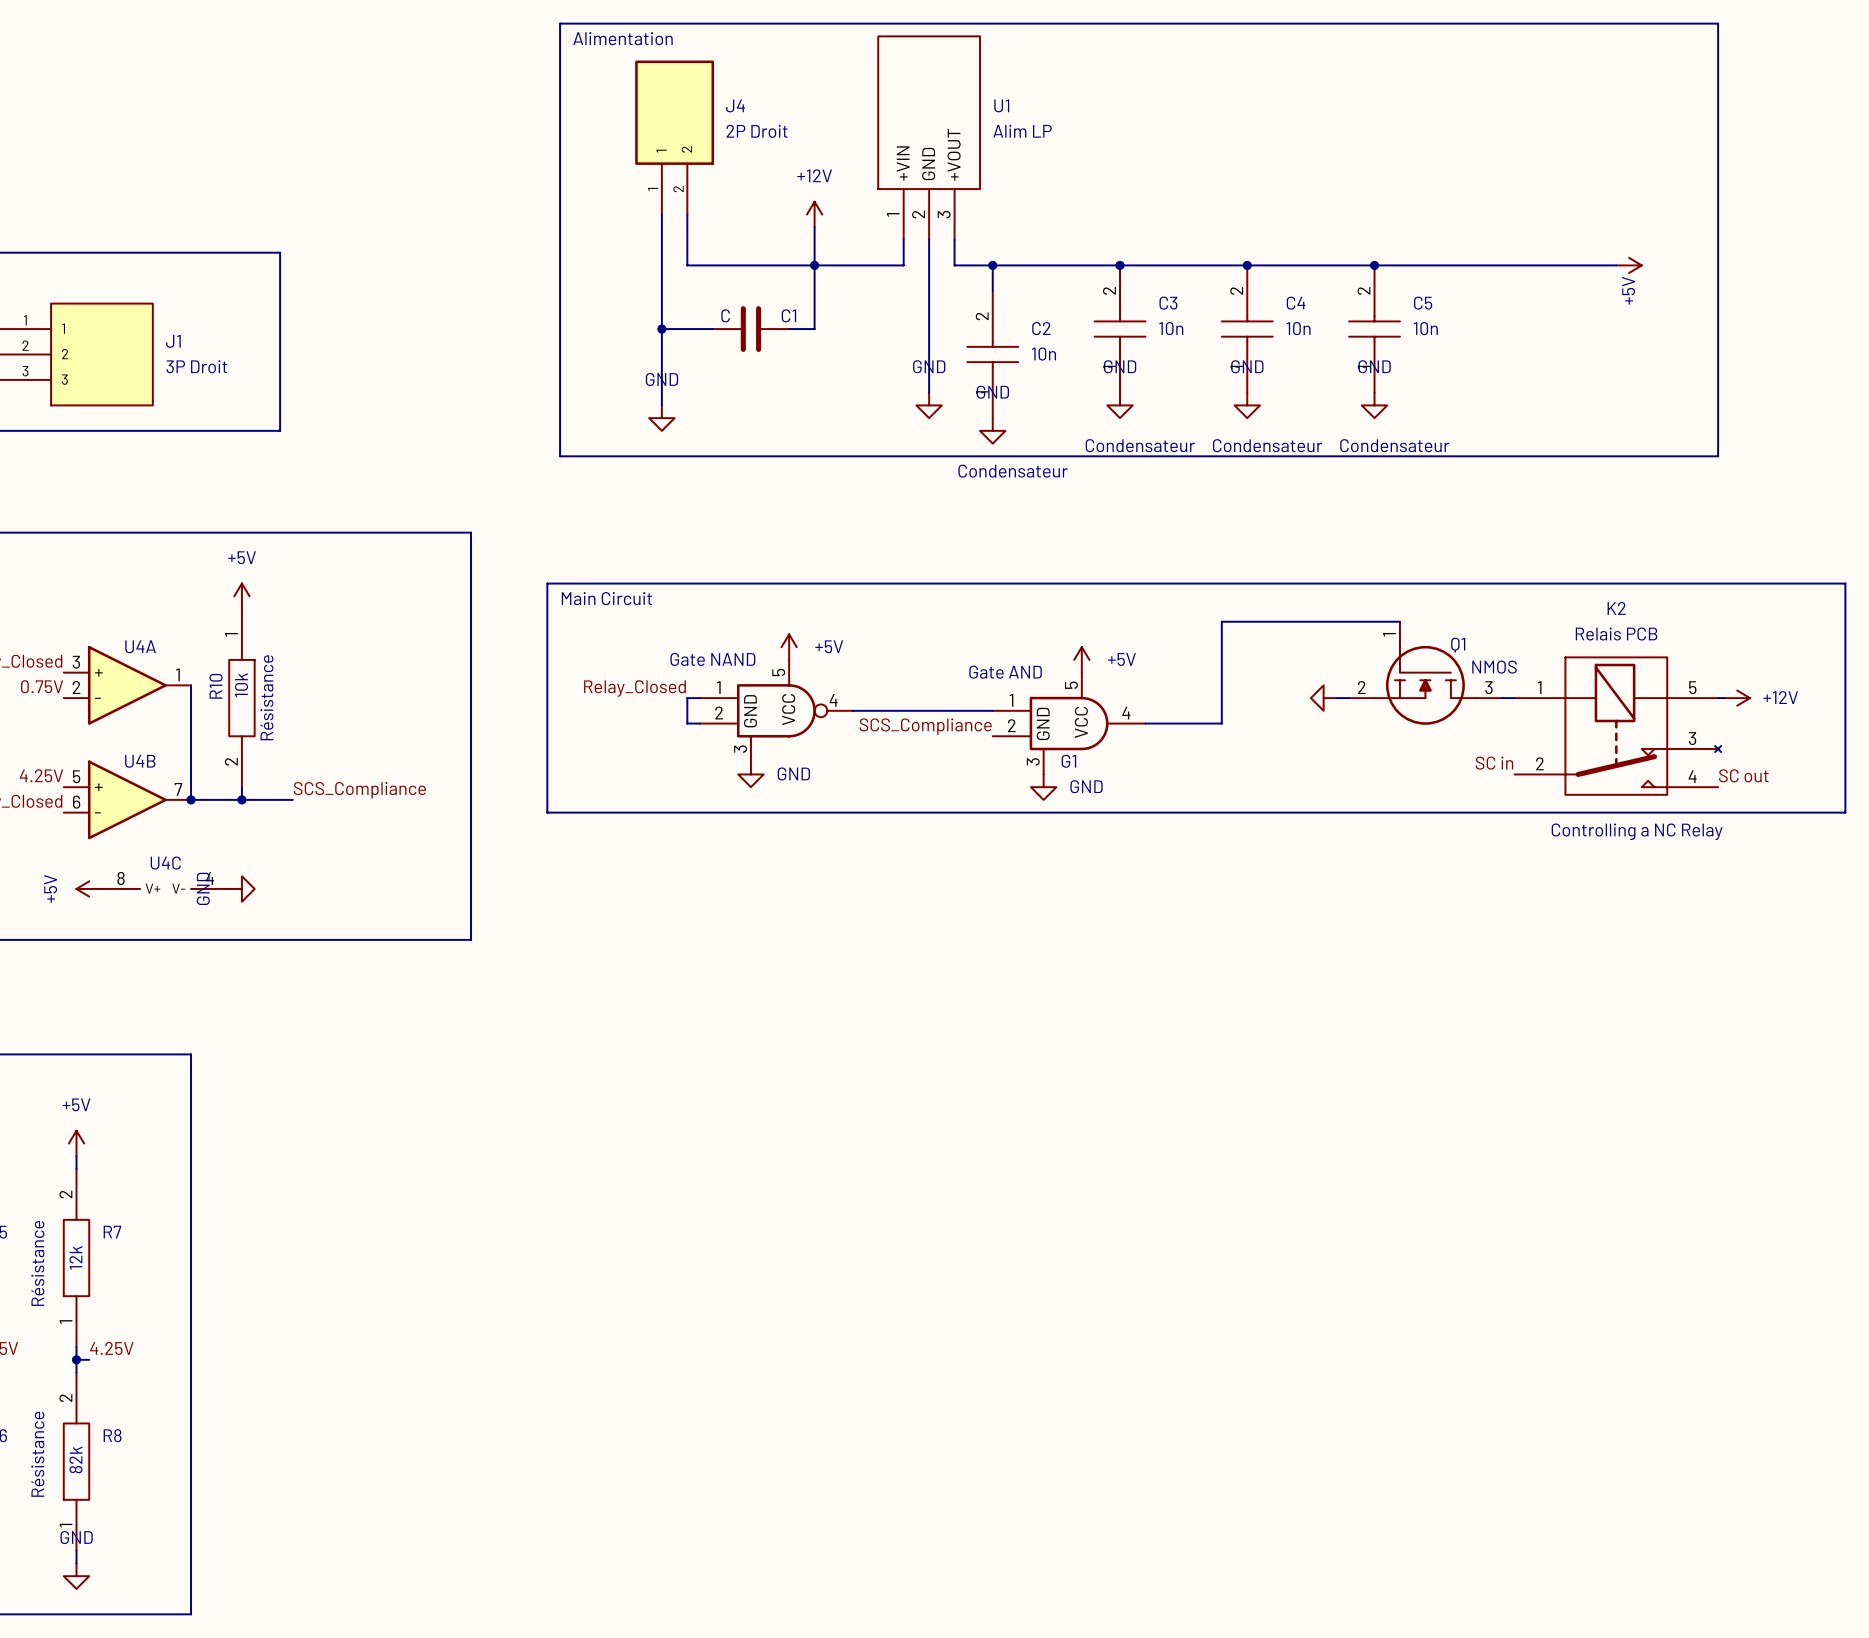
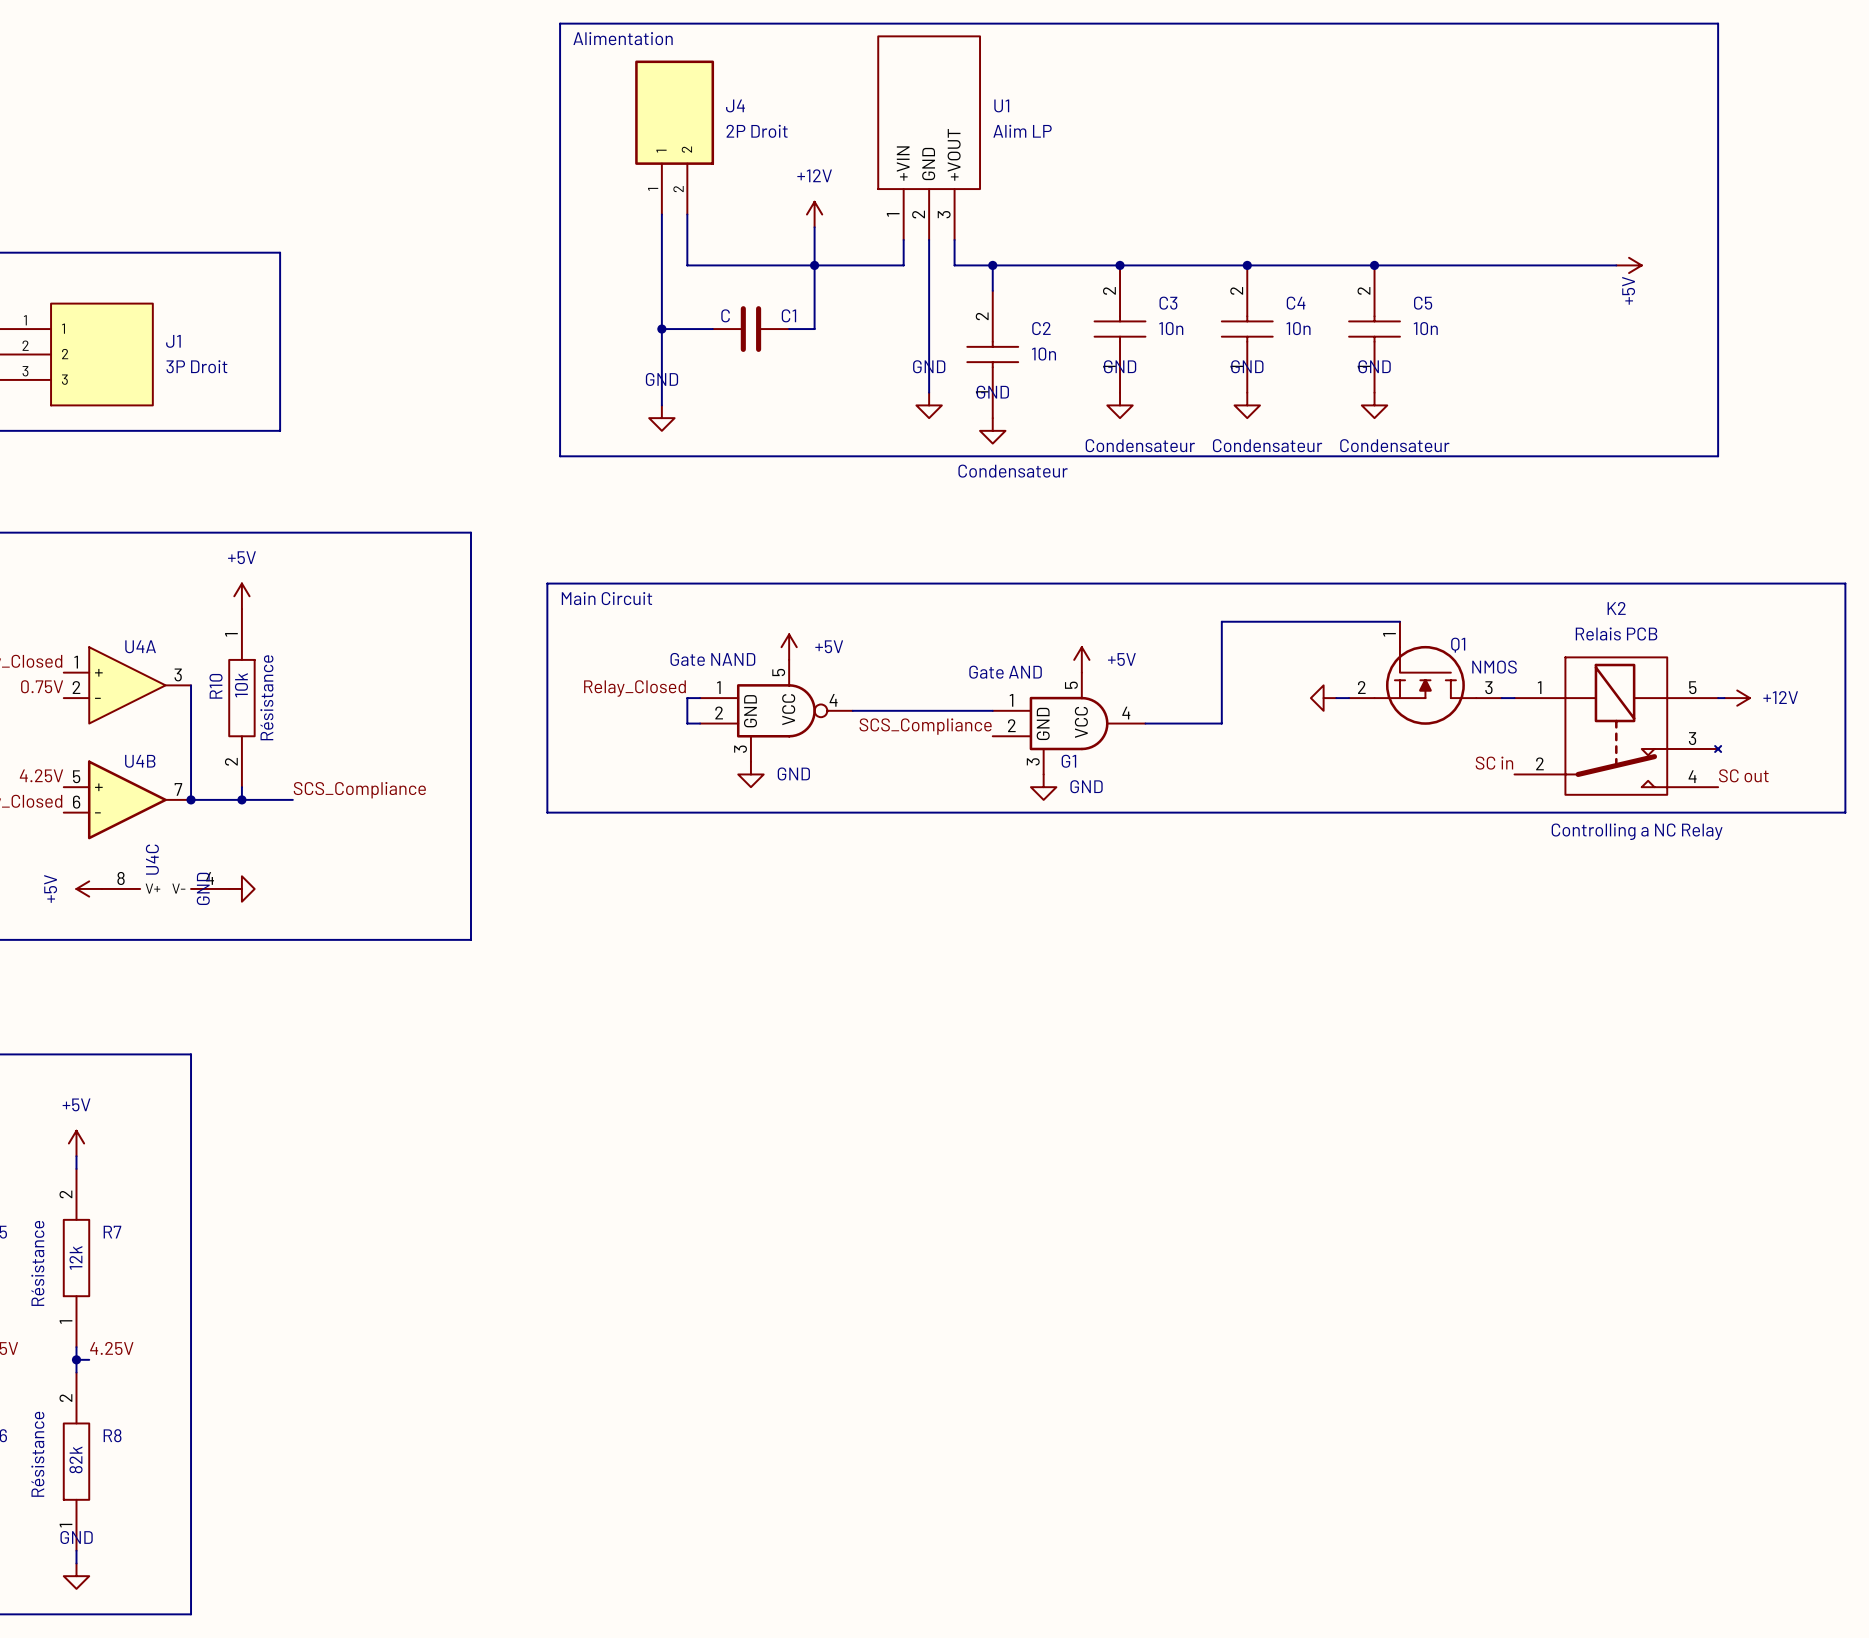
U4A symbol: [63, 645, 192, 725] -> [63, 647, 192, 724]
U4C name rotation: 0° (165, 863) -> 90° counterclockwise (152, 859)

